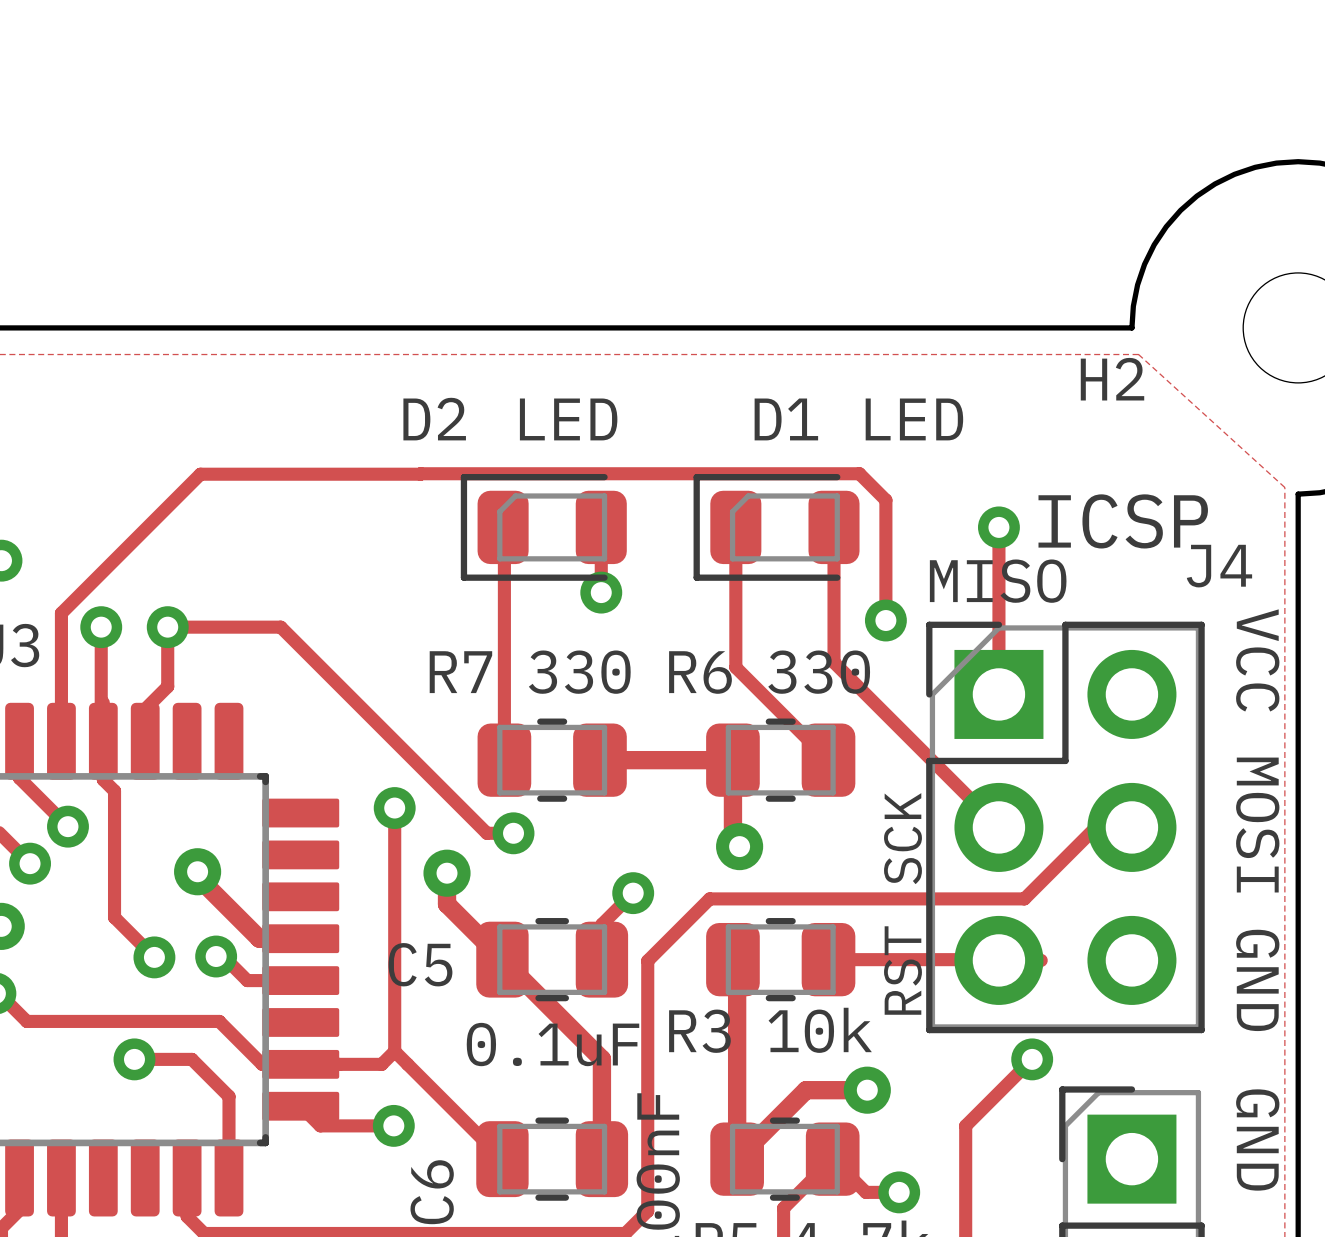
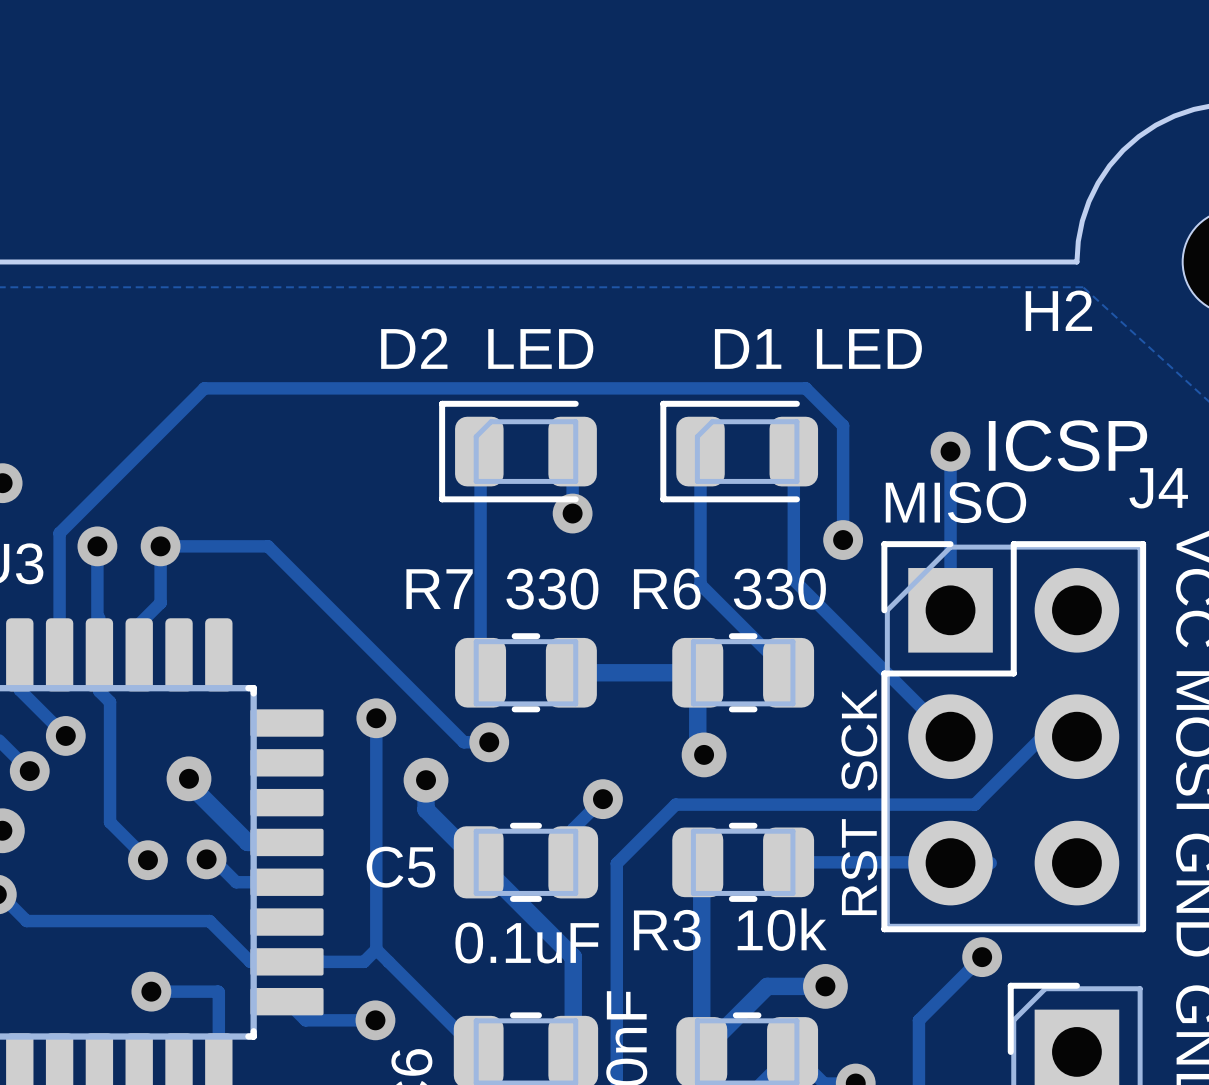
track: (420, 473) (859, 473) -> (191, 401) (204, 388) (805, 388) (817, 400)
track: (200, 474) (420, 474) -> none
track: (134, 1059) (191, 1059) (228, 1095) -> (151, 991) (218, 991)
via position: (134, 1059) -> (151, 991)

